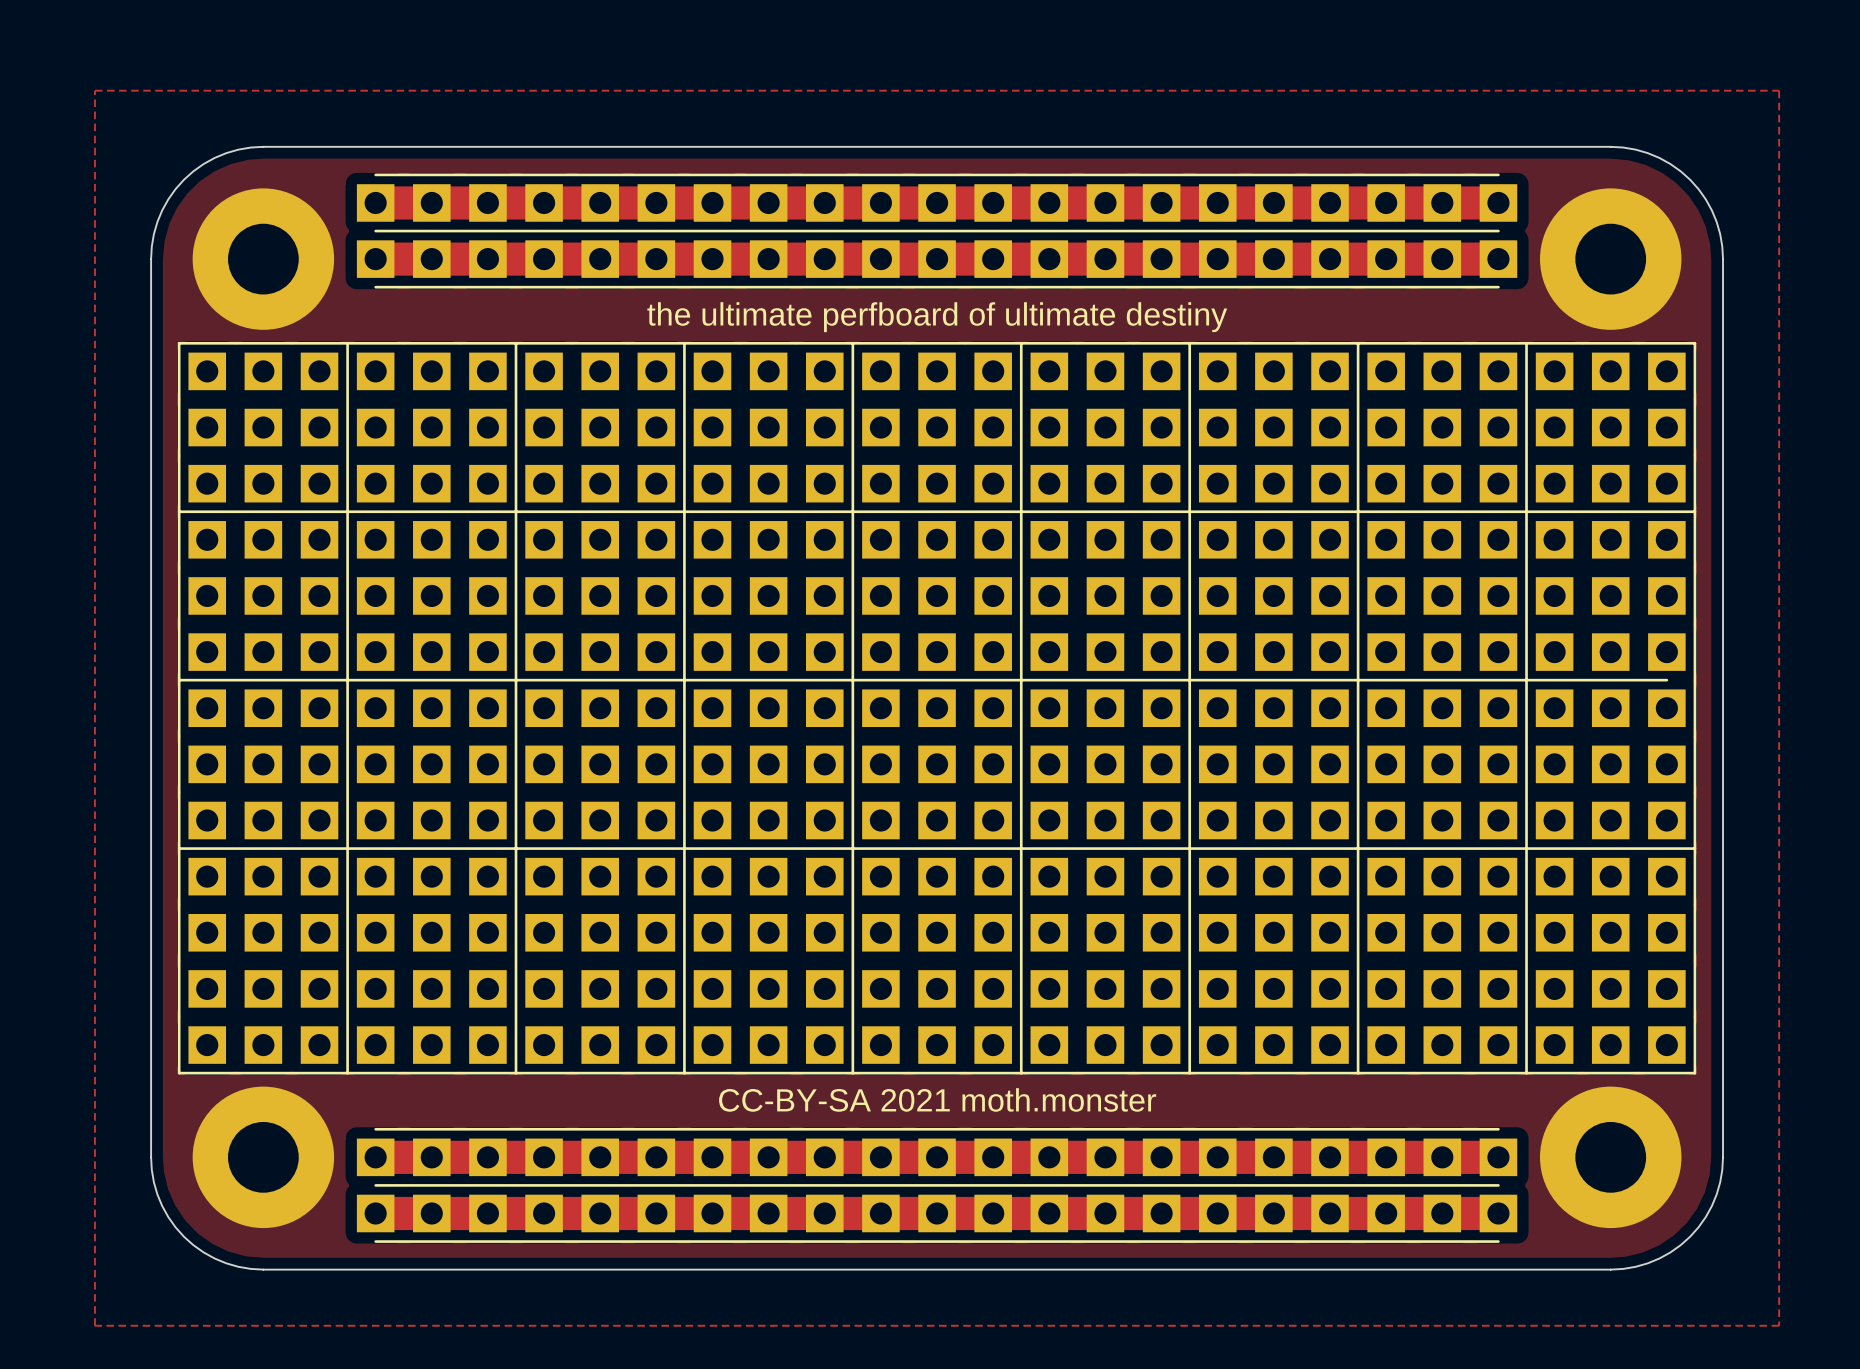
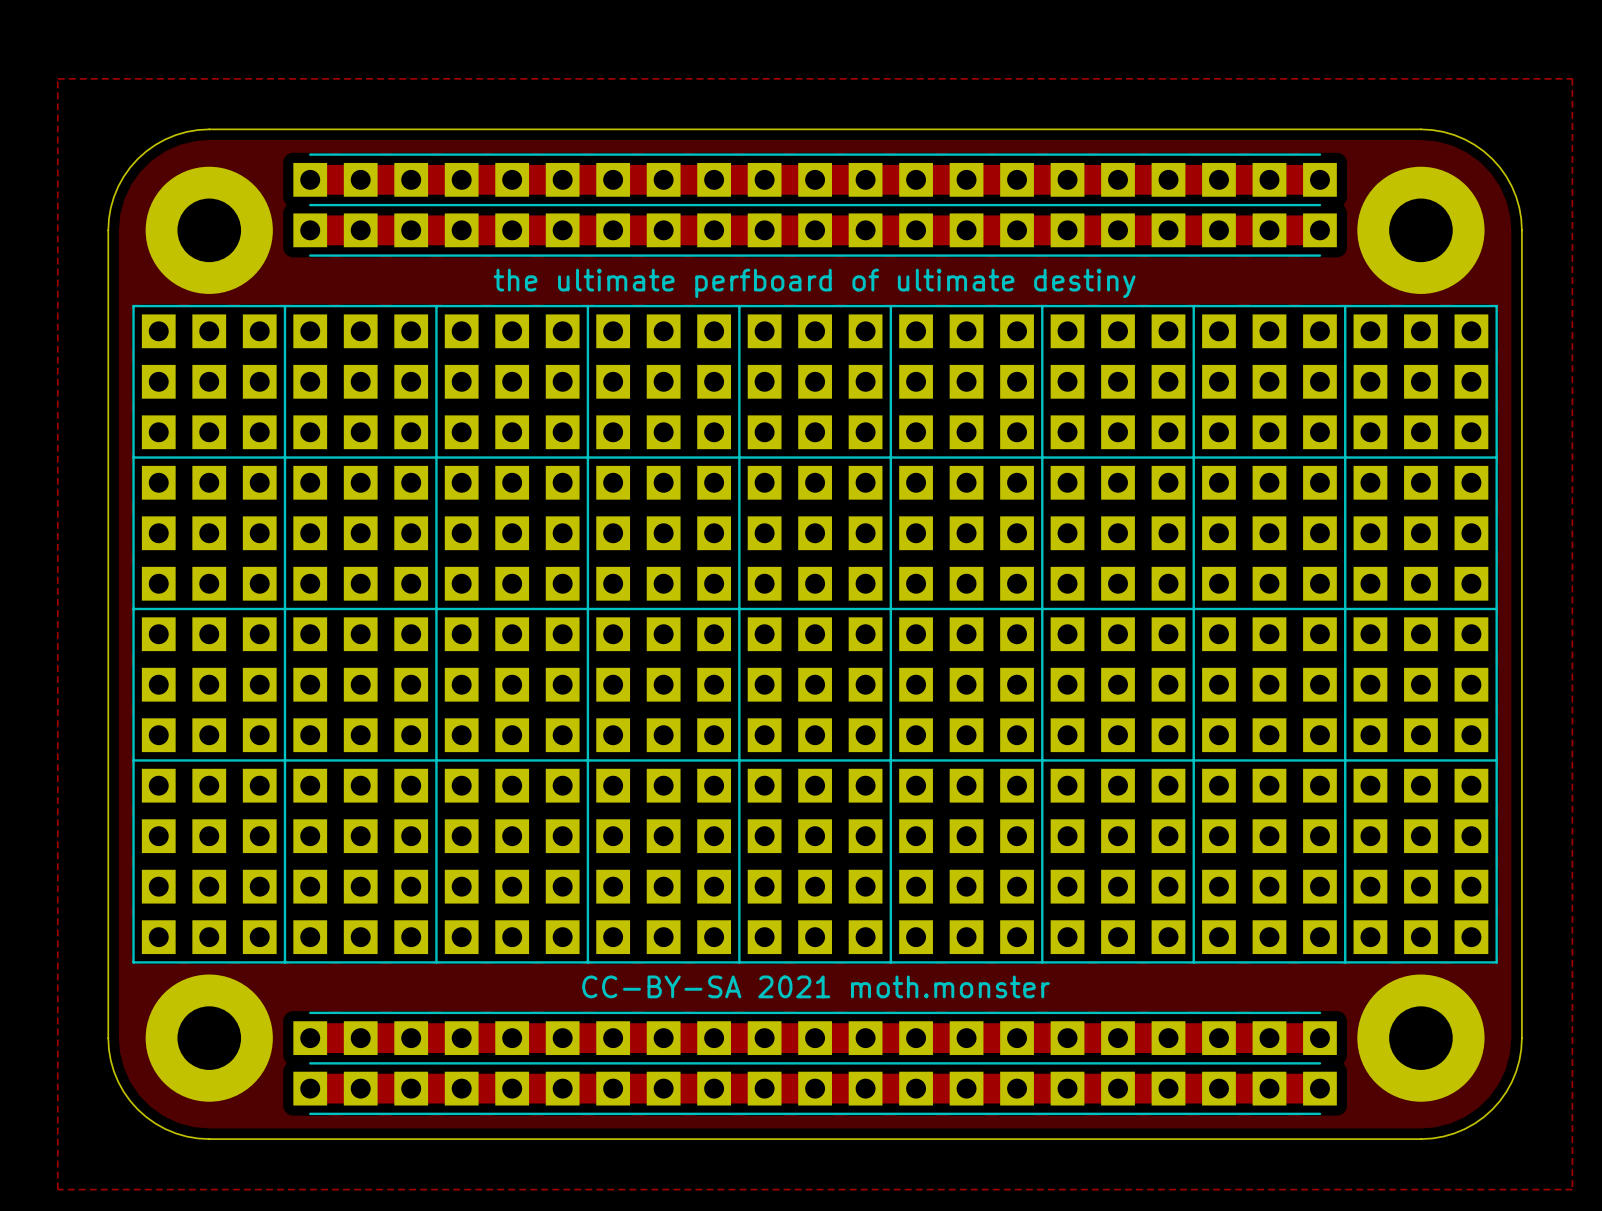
line: none -> (1471, 608) (1496, 608)

